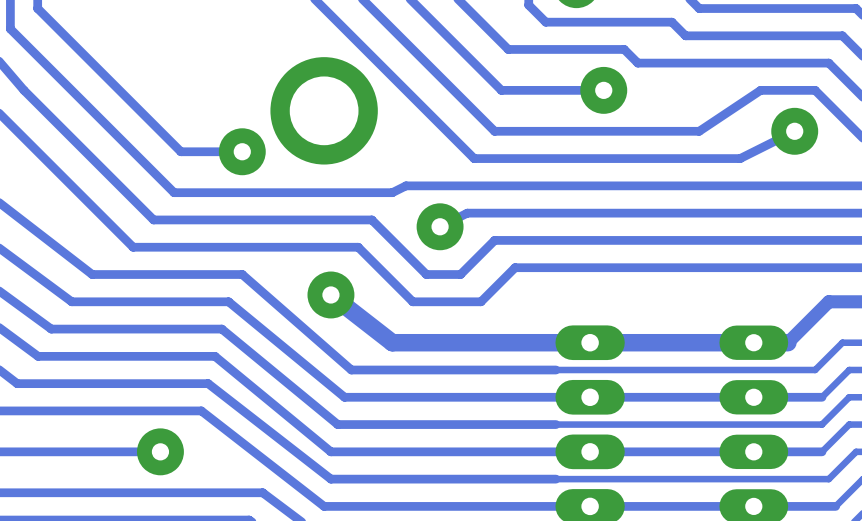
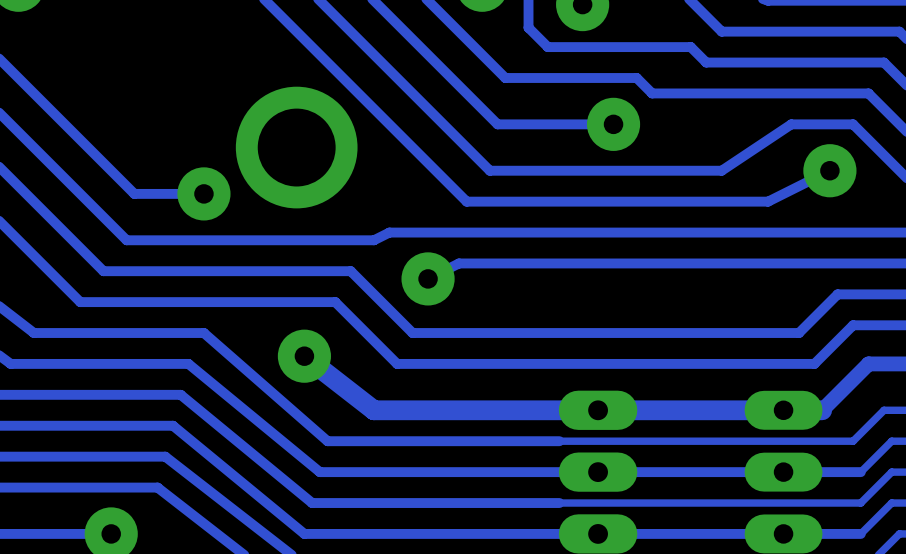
track: (801, 240) (494, 240) (460, 274) -> (837, 294) (799, 333) (451, 333)
track: (815, 267) (515, 267) (480, 301) -> (853, 325) (814, 363) (474, 363)

